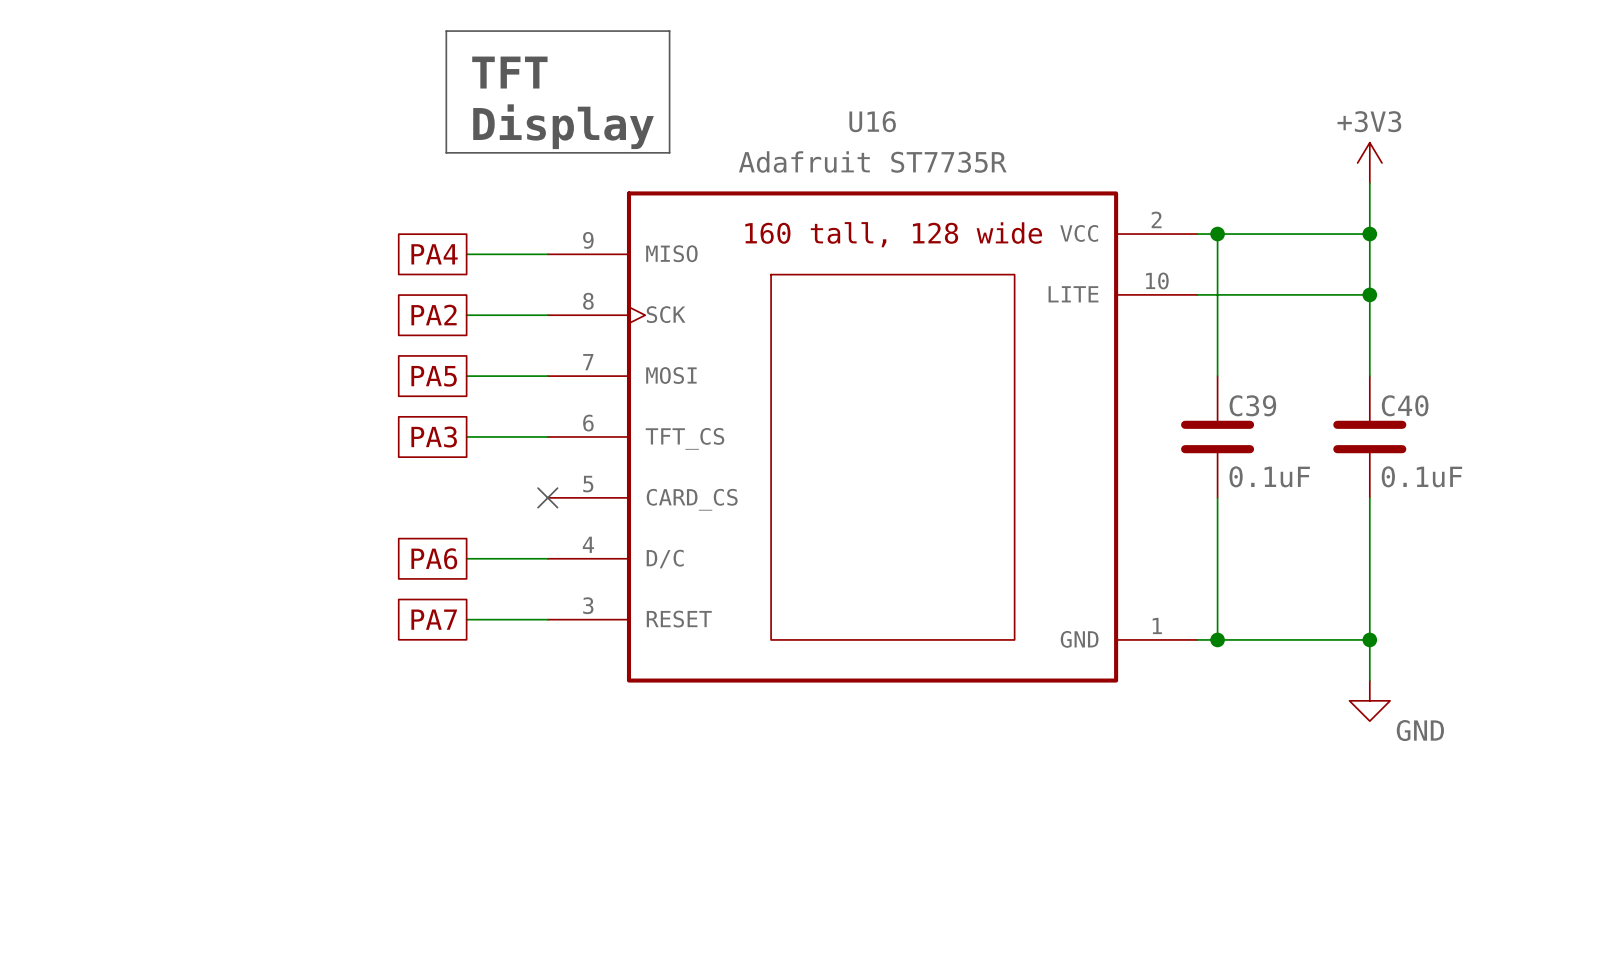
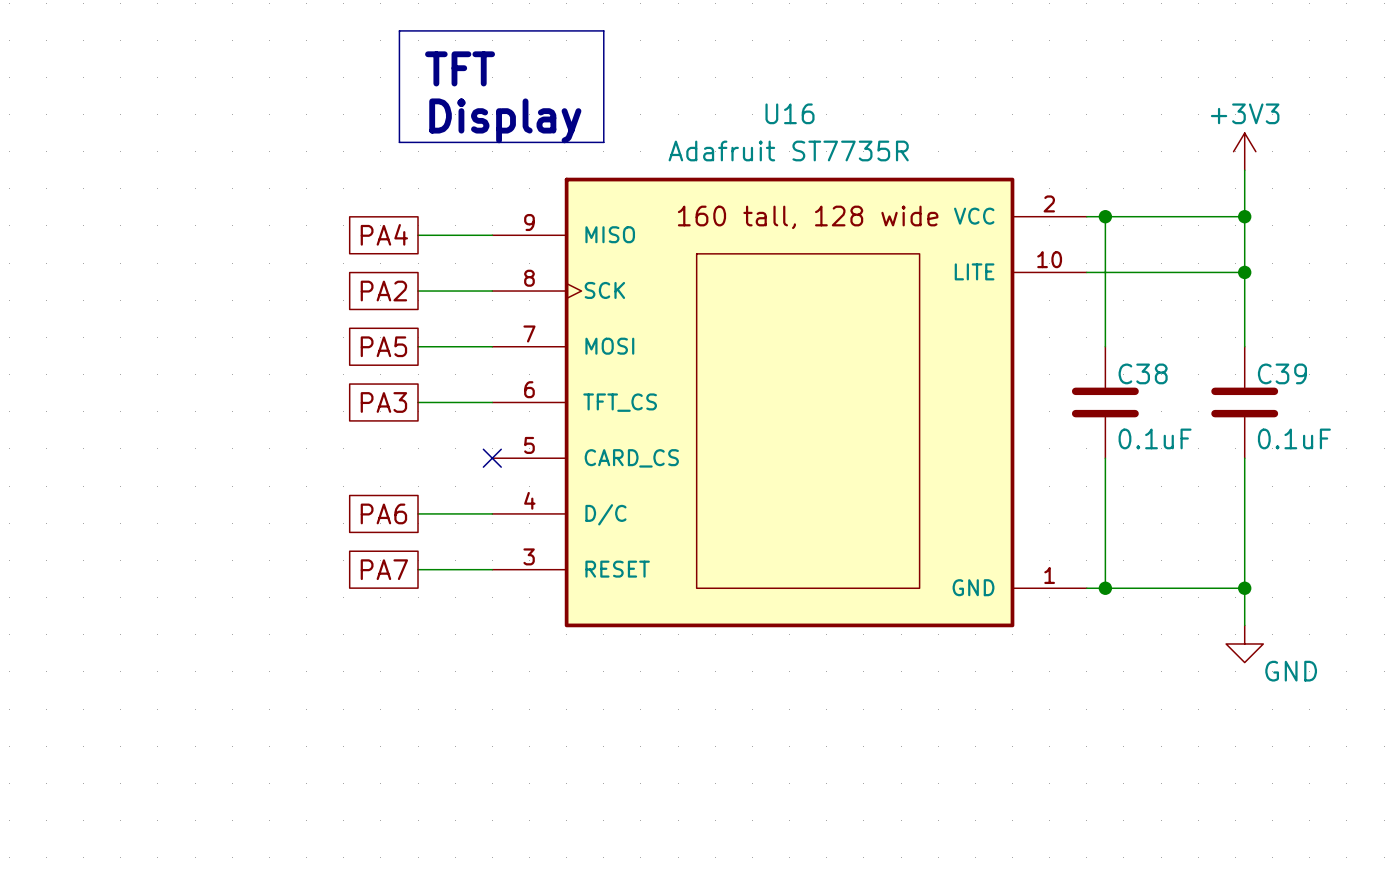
C39 name: C39 (1252, 405) -> C38 (1143, 373)
C40 name: C40 (1405, 405) -> C39 (1282, 373)

